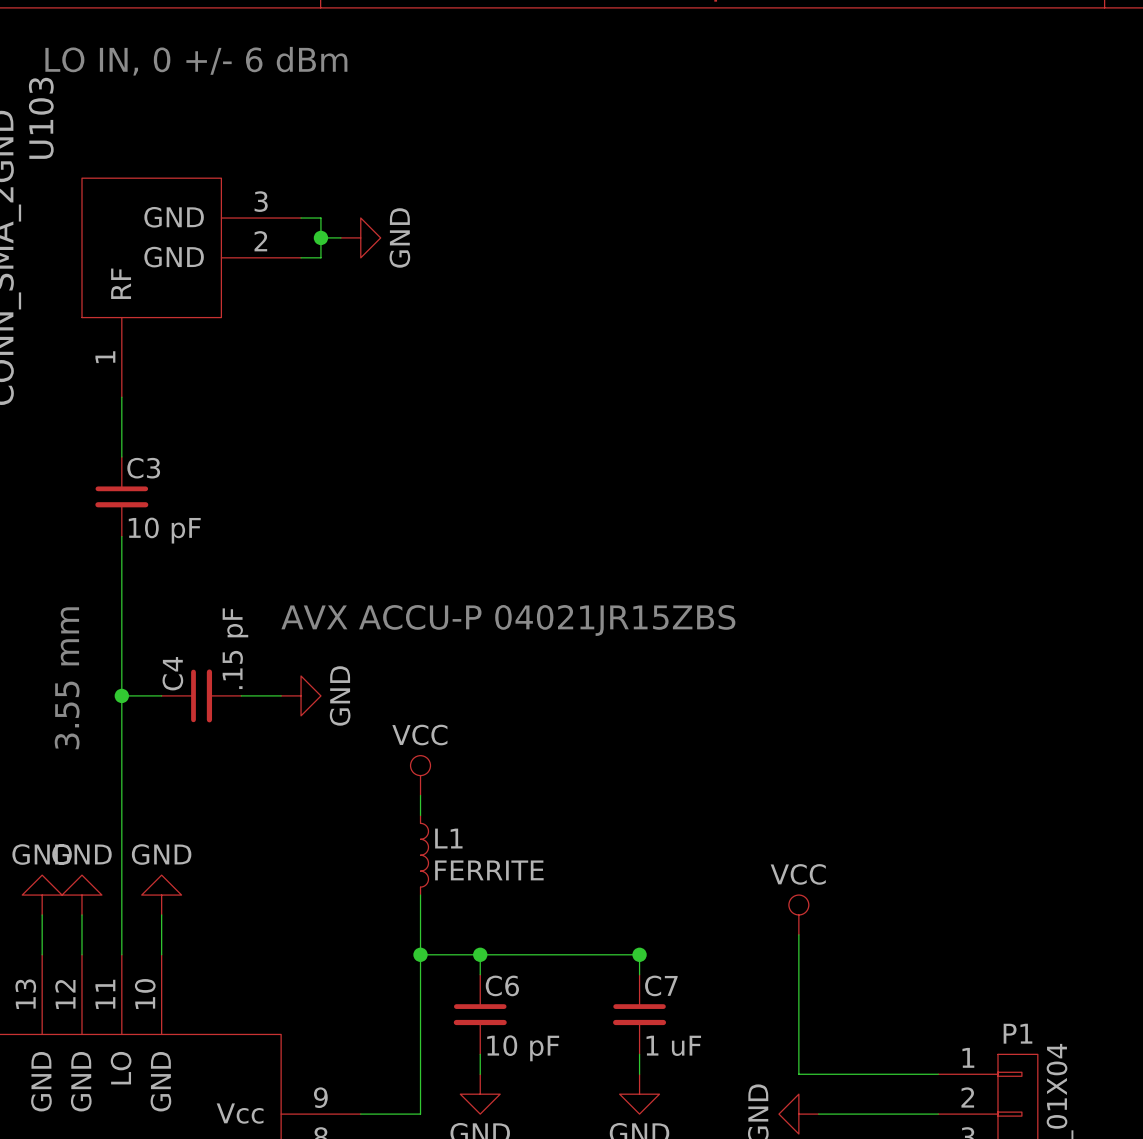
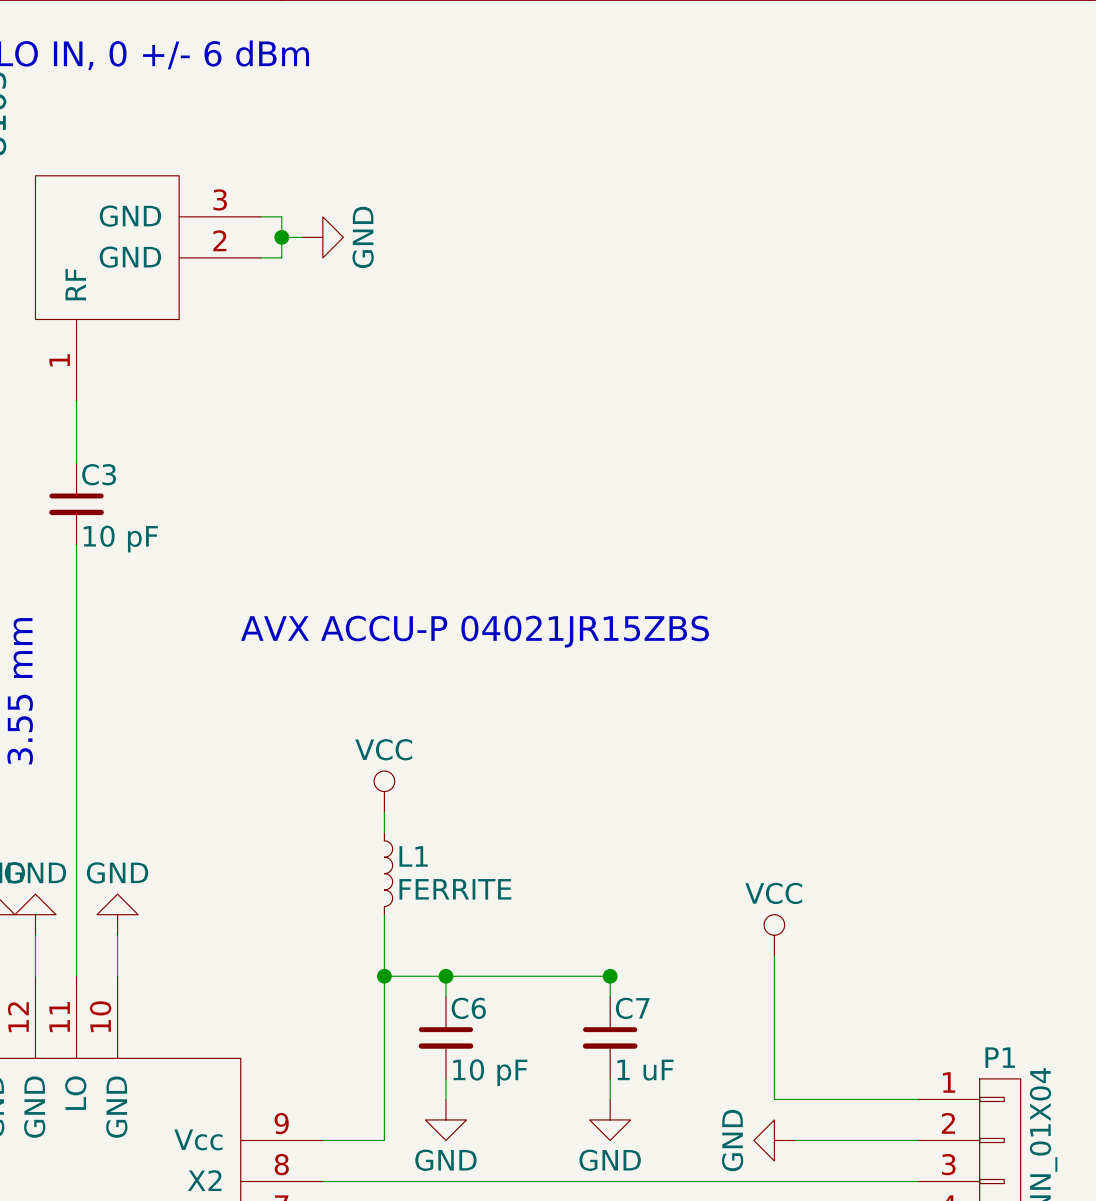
wire: (121, 695) (161, 695) -> none
junction: (121, 695) -> none
C4: .15 pF (201, 695) -> none
wire: (241, 695) (281, 695) -> none
power symbol: GND (301, 695) -> none

